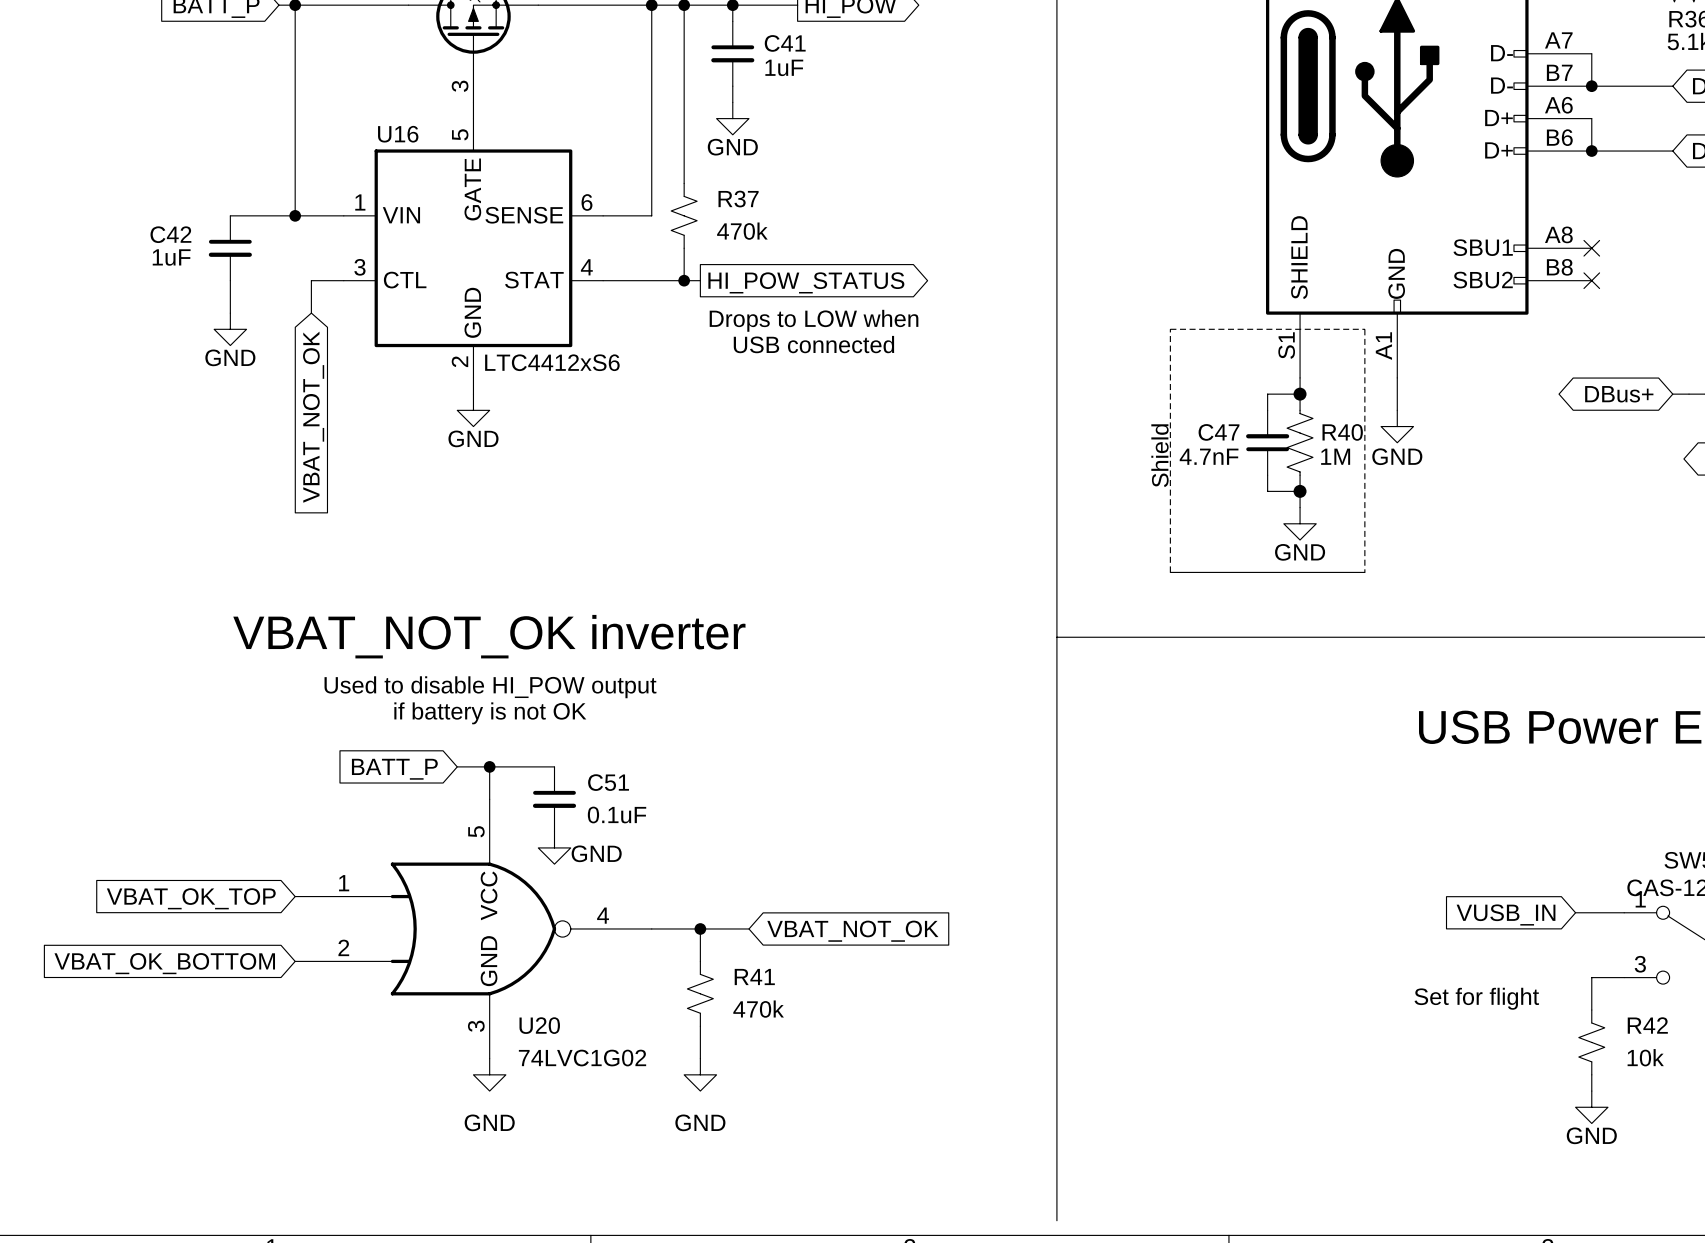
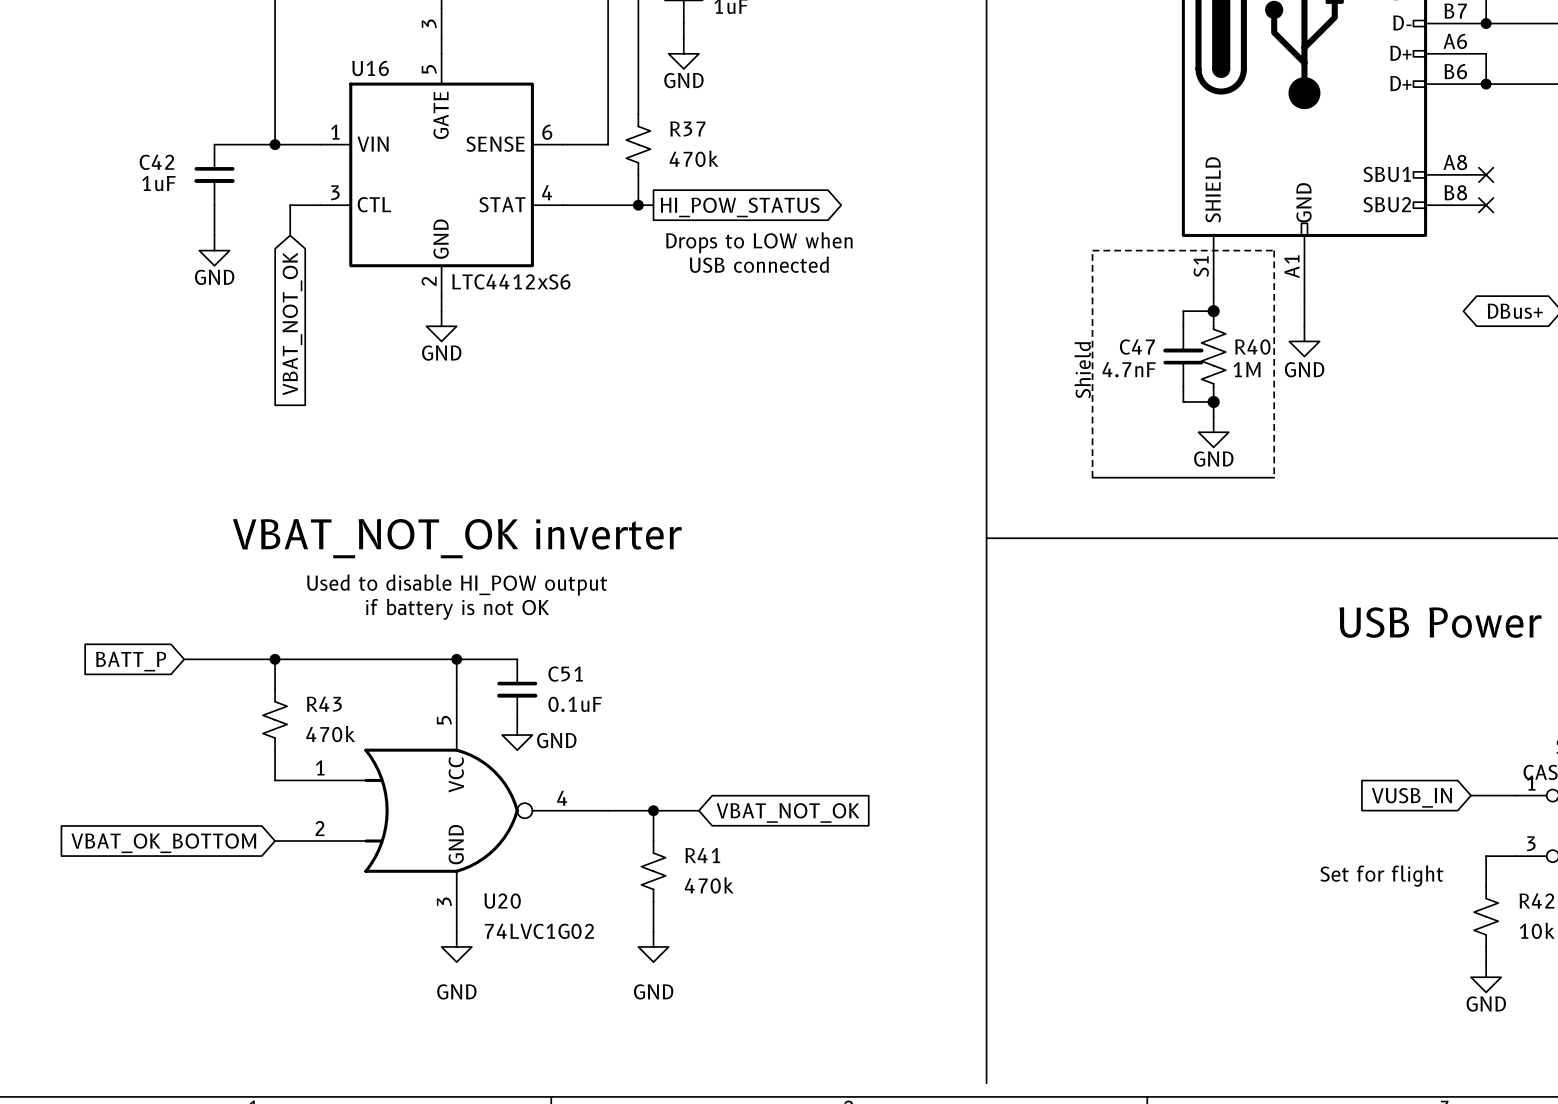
wire: none -> (184, 659) (426, 659)
wire: none -> (275, 659) (275, 689)
junction: none -> (275, 659)
global label position: BATT_P (394, 769) -> BATT_P (131, 661)
R43: none -> 470k (275, 719)
wire: none -> (275, 750) (275, 780)
global label: VBAT_OK_TOP (191, 898) -> none

